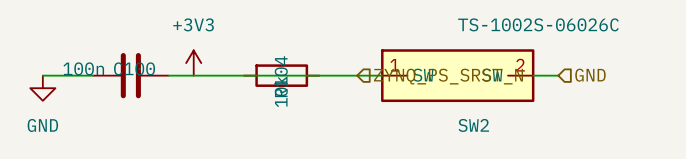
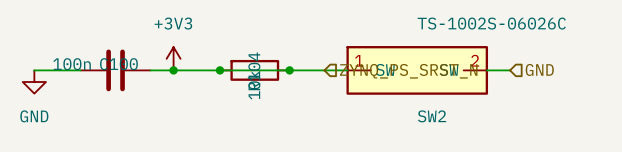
junction: none -> (173, 70)
junction: none -> (219, 70)
junction: none -> (289, 70)

